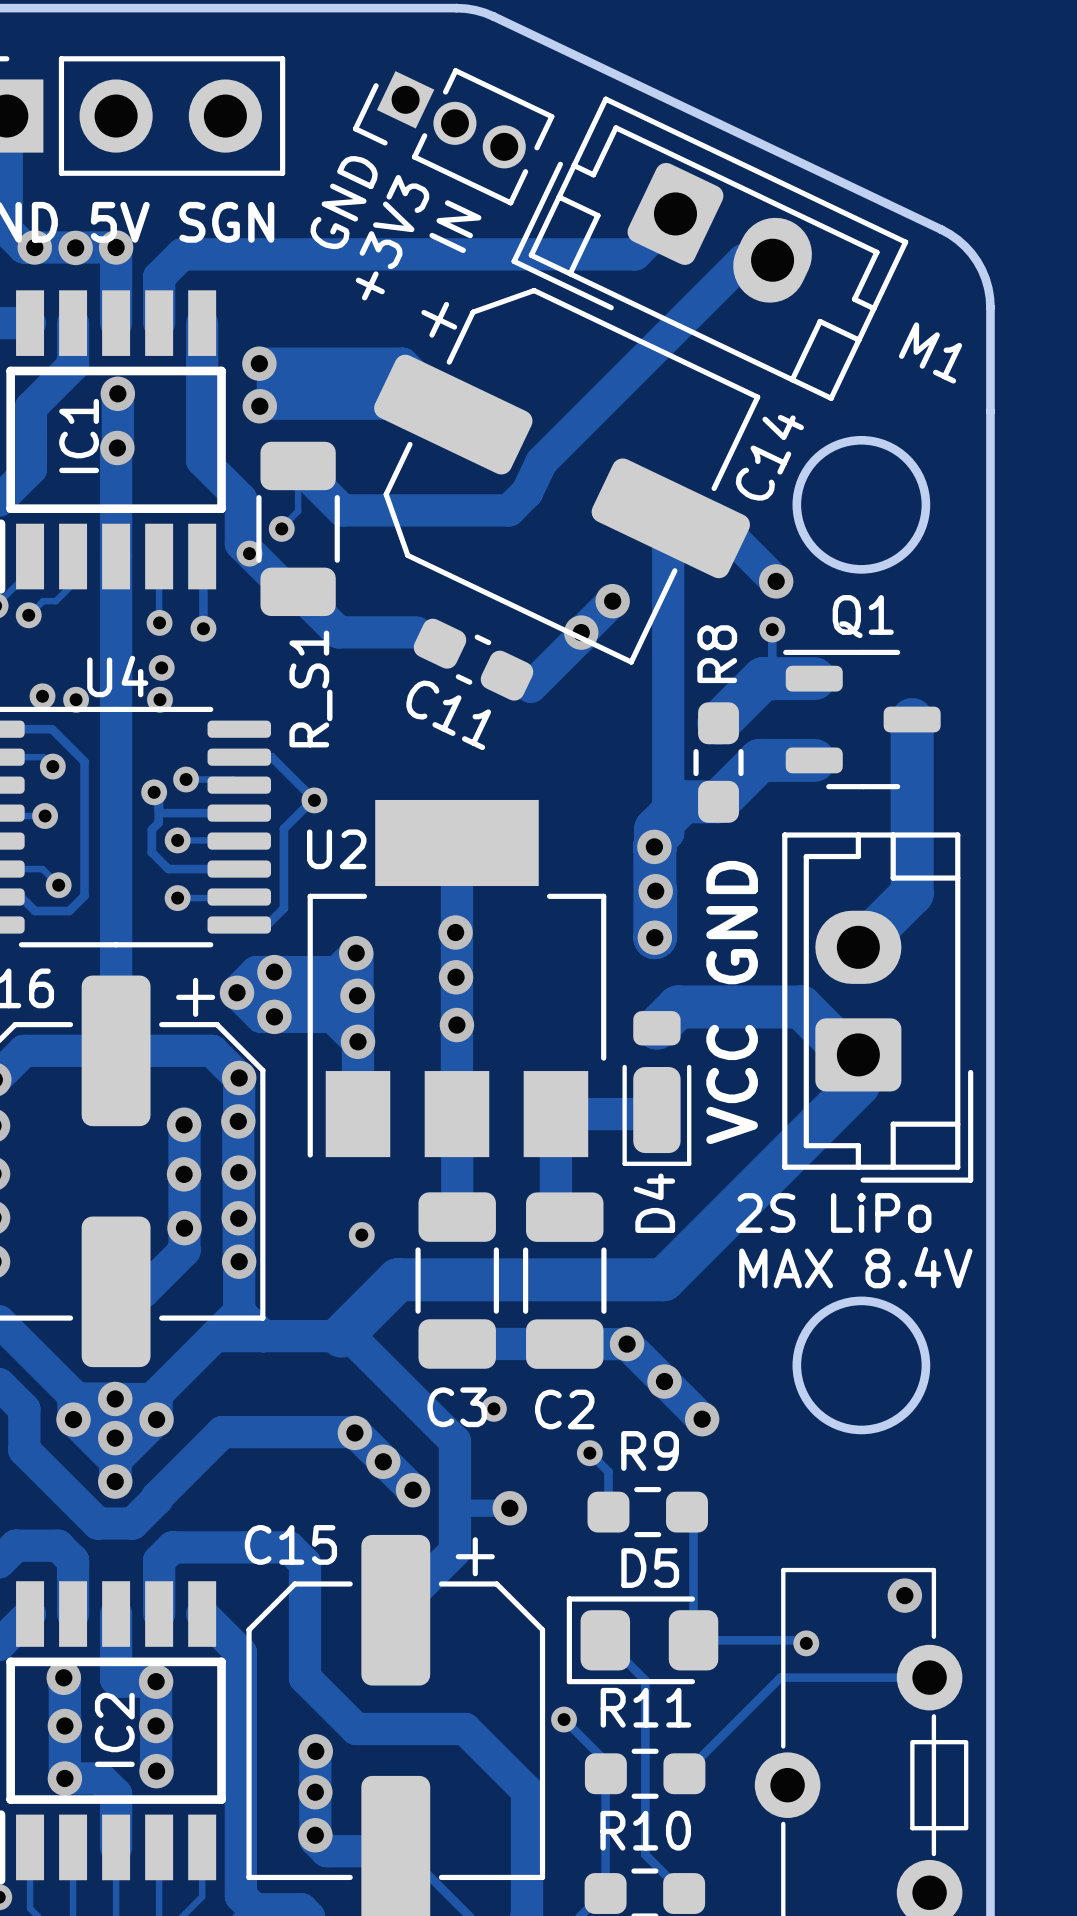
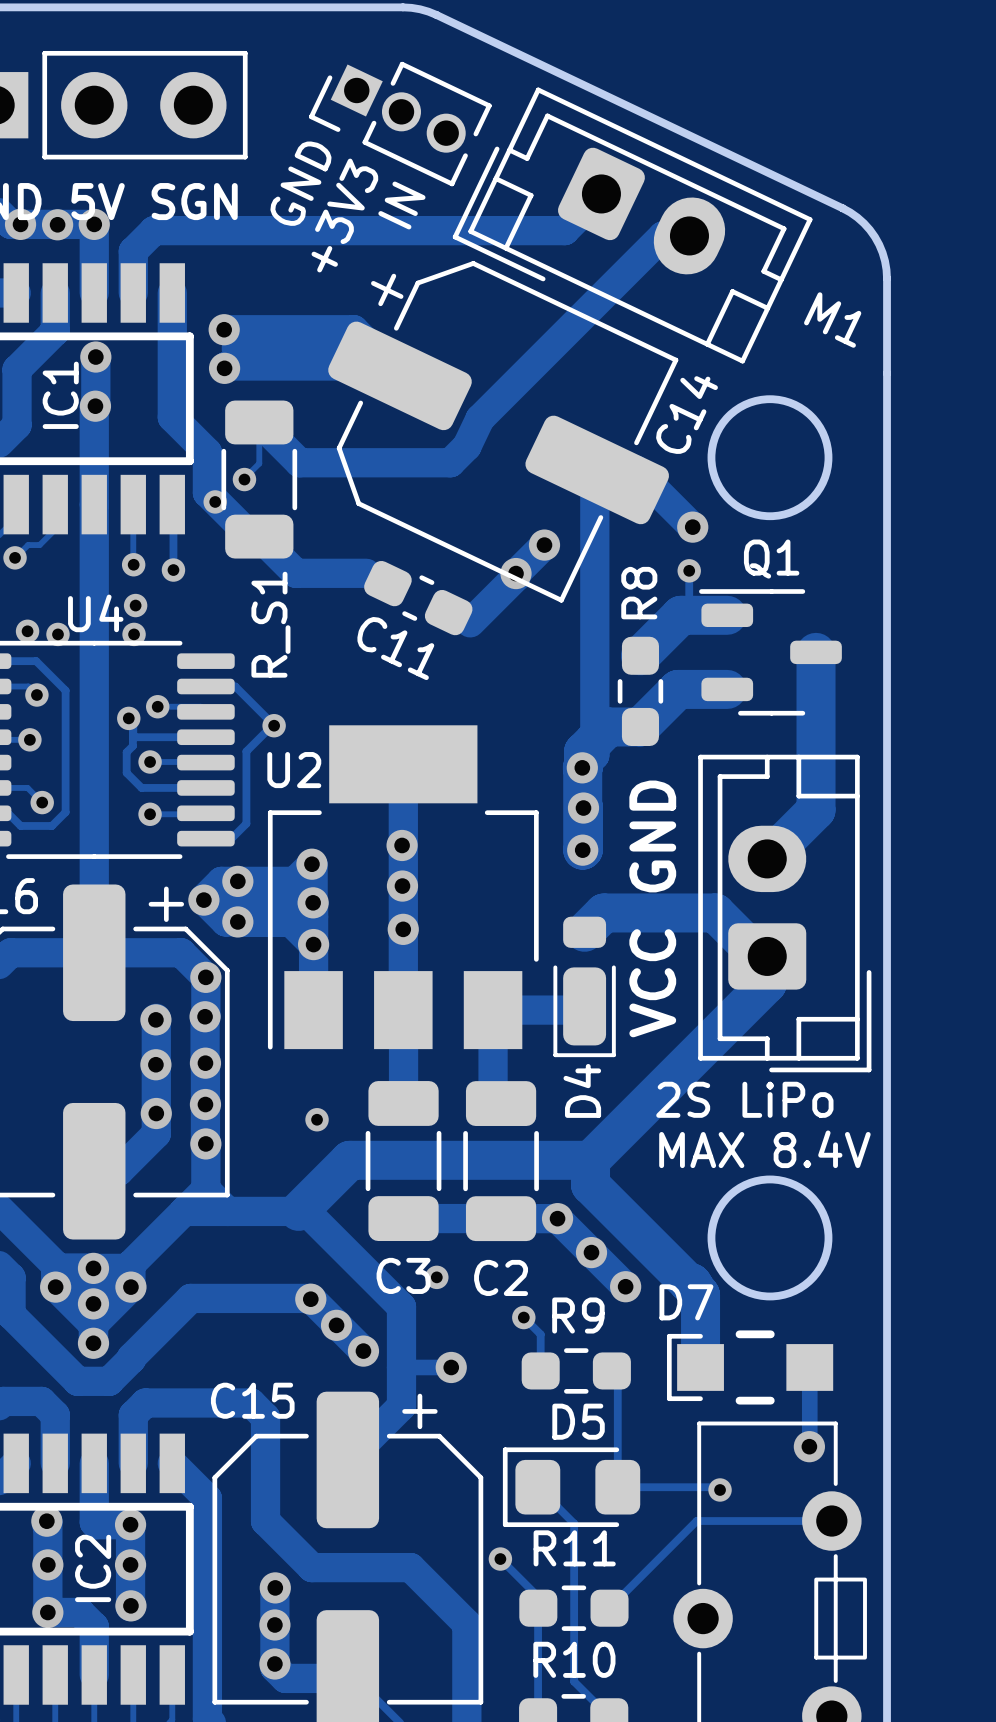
track: none -> (590, 1160) (590, 1184) (688, 1282) (691, 1282) (700, 1294) (700, 1367)
D7: none -> (750, 1367)
track: none -> (809, 1367) (809, 1446)

